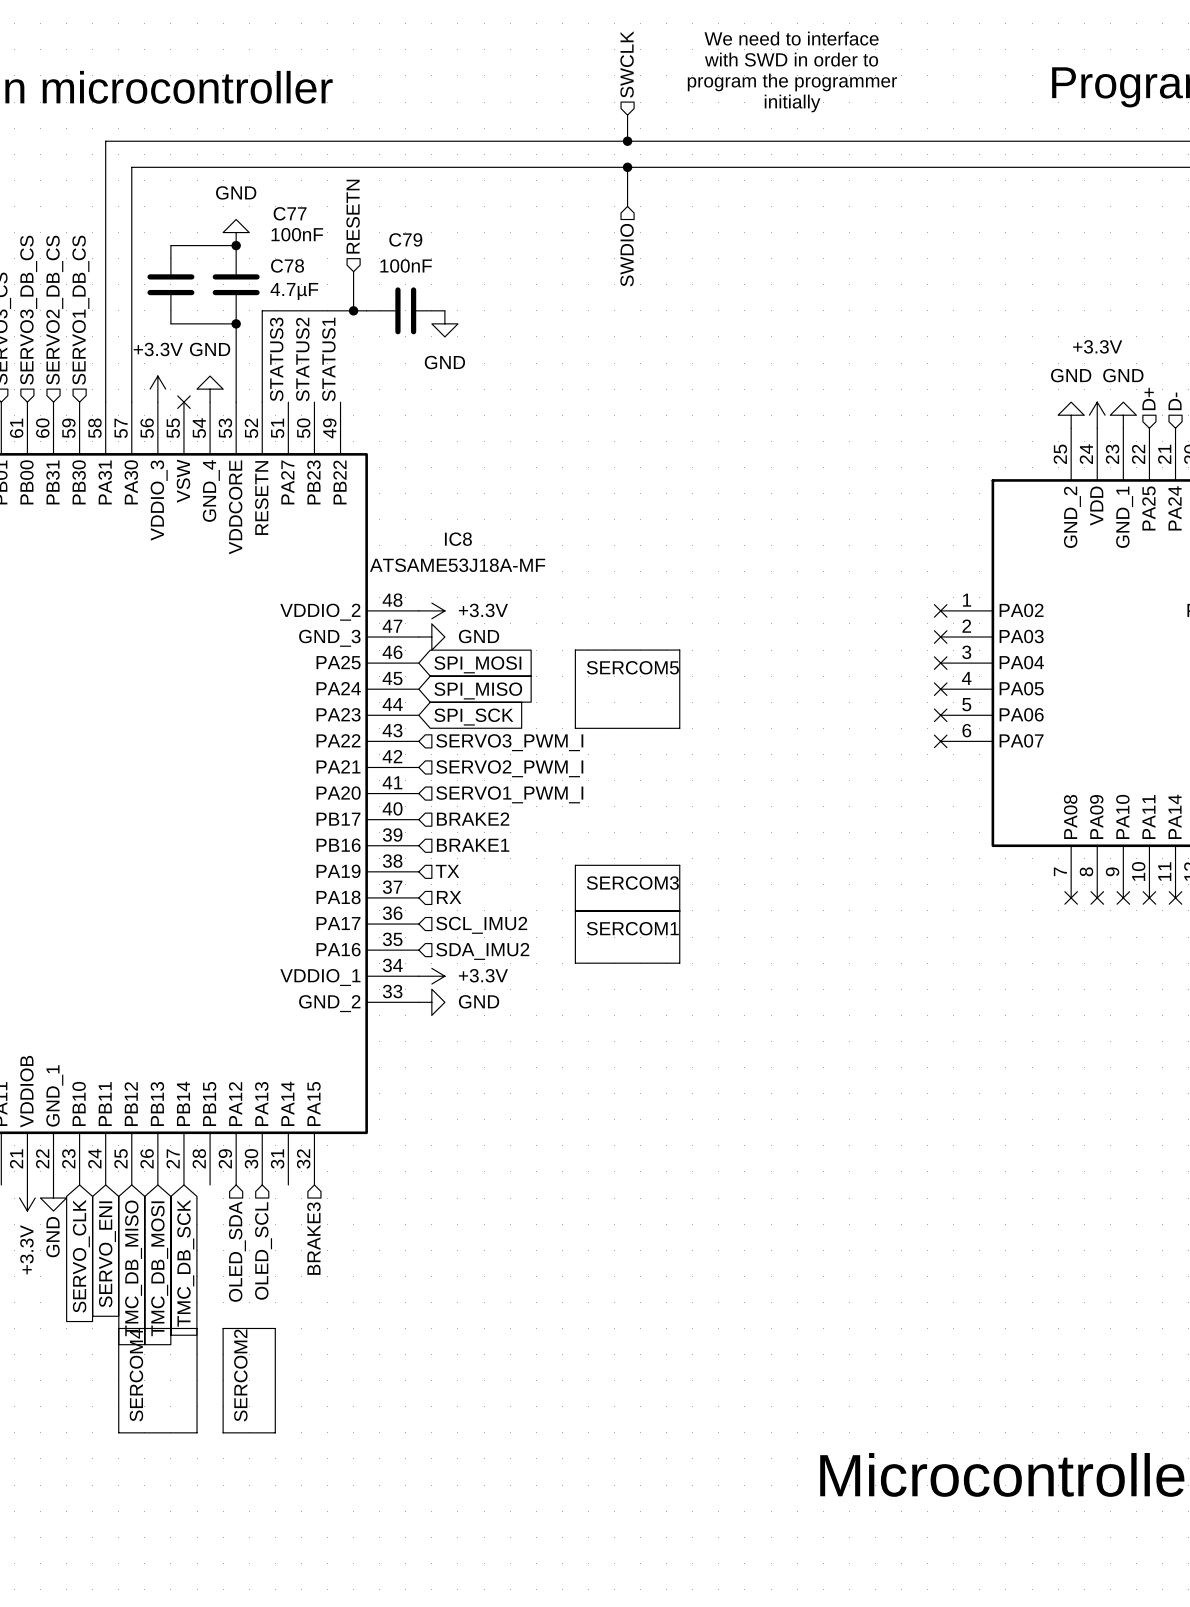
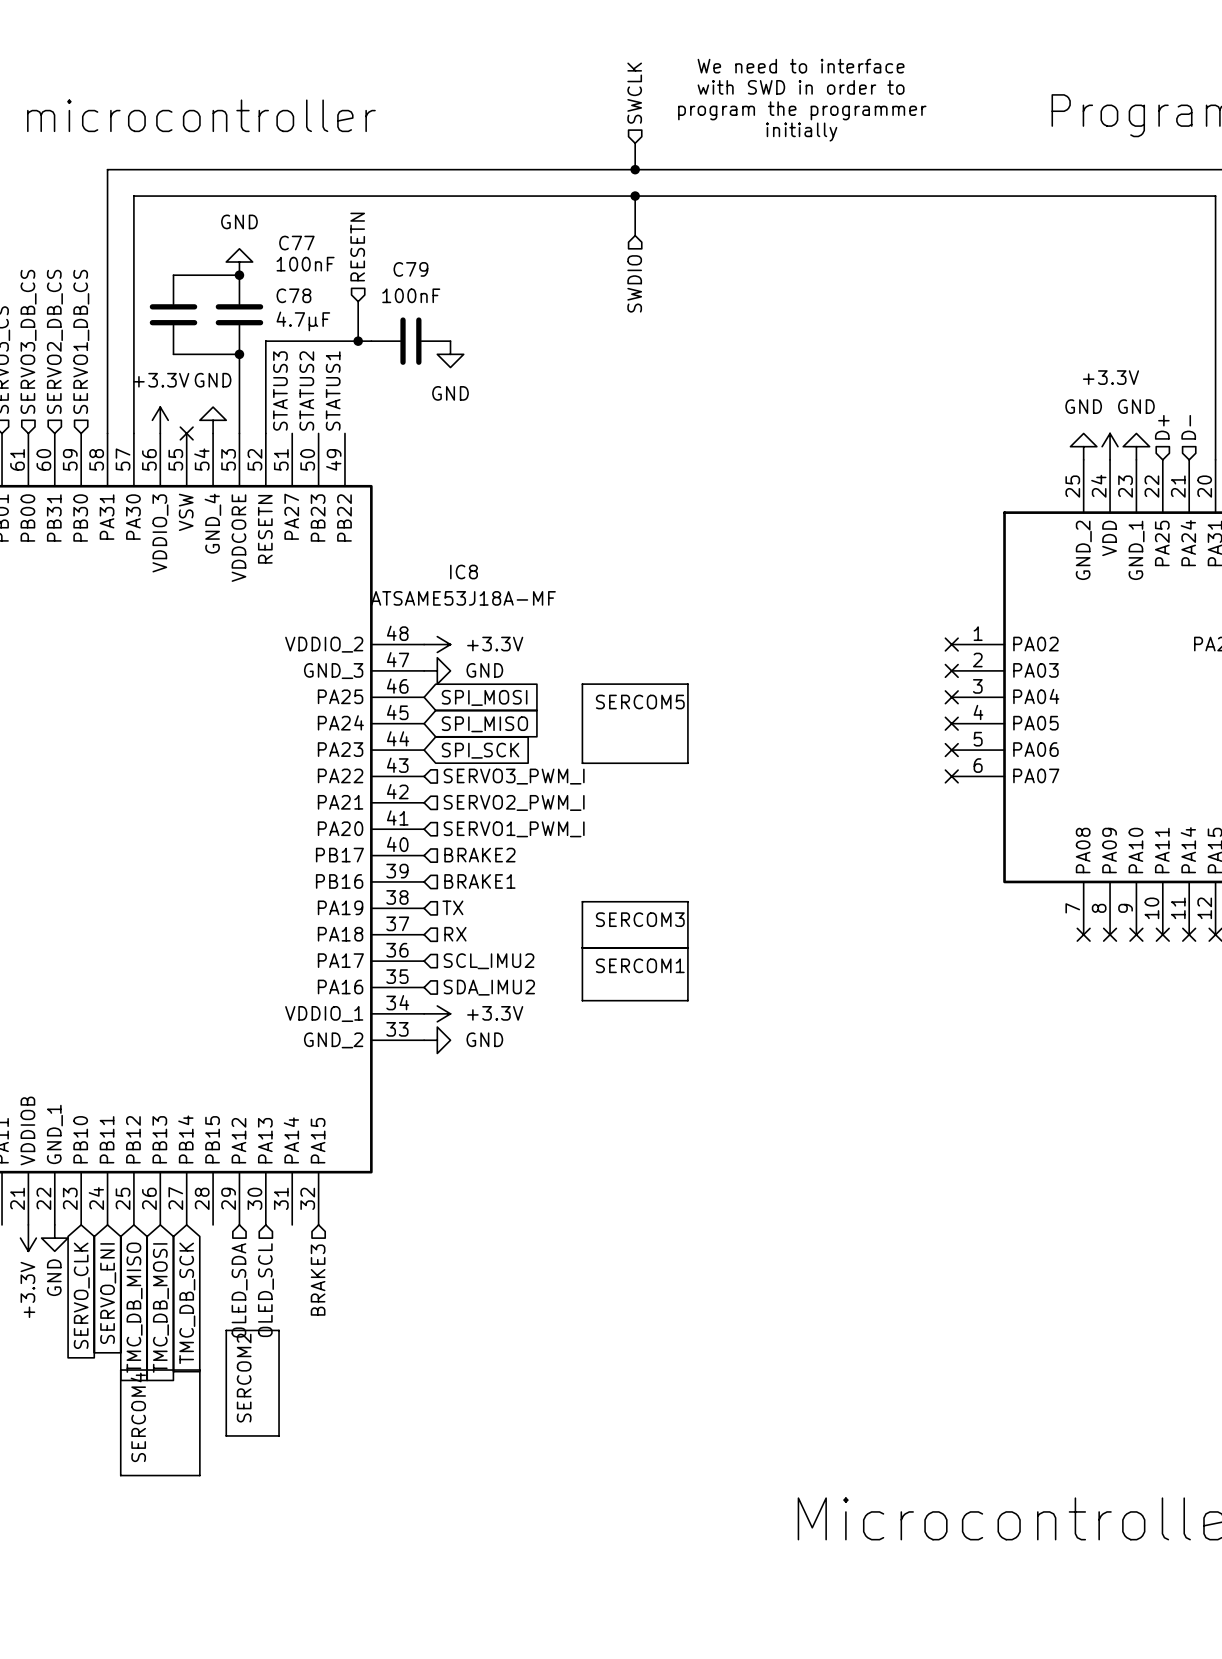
line: (223, 1328) (275, 1328) -> (226, 1370) (226, 1330) (279, 1330) (279, 1370)
text position: SERCOM2 (240, 1375) -> SERCOM2 (244, 1378)
line: (223, 1393) (223, 1432) (275, 1432) (275, 1393) -> (226, 1435) (279, 1435)

